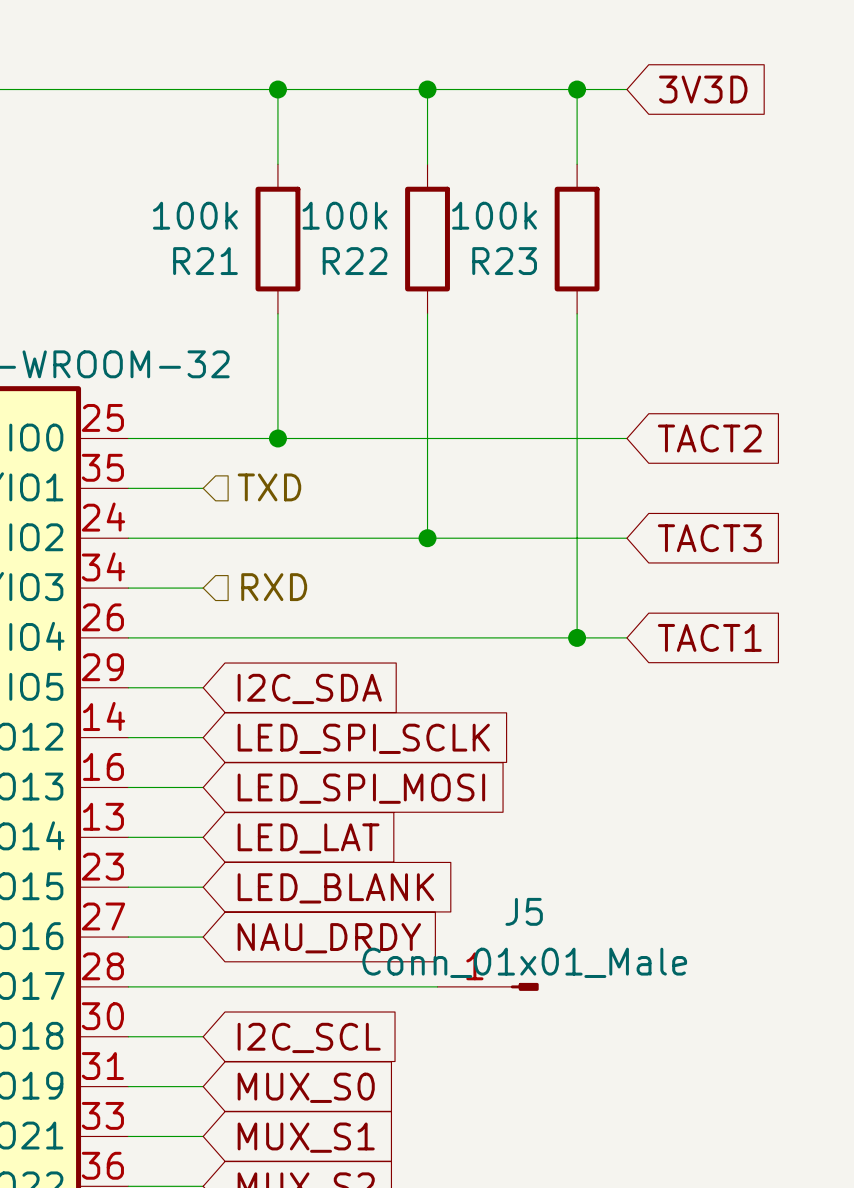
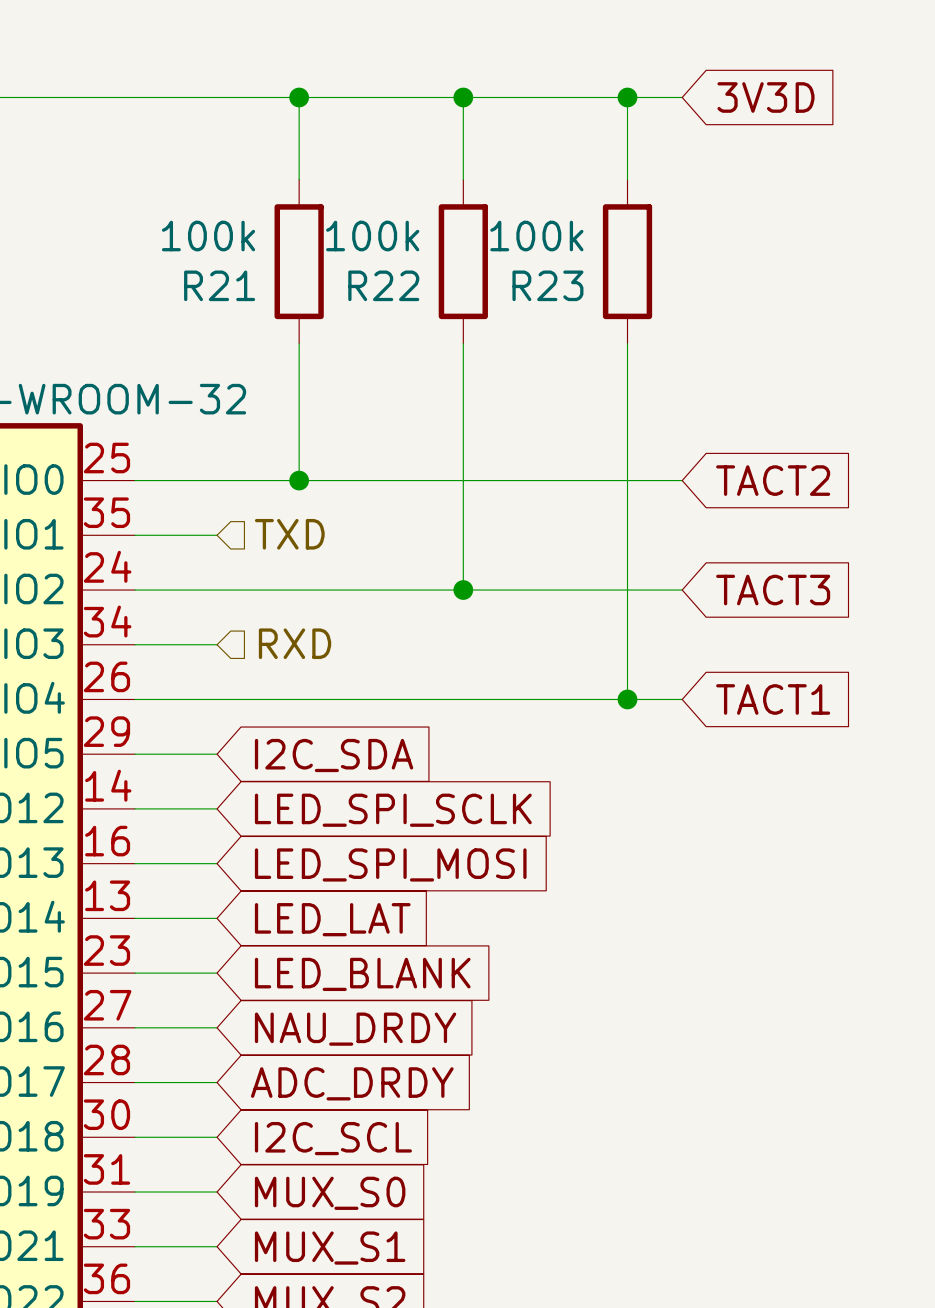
wire: (203, 986) (437, 986) -> none
J5: Conn_01x01_Male (488, 986) -> none
global label: none -> ADC_DRDY (352, 1083)

